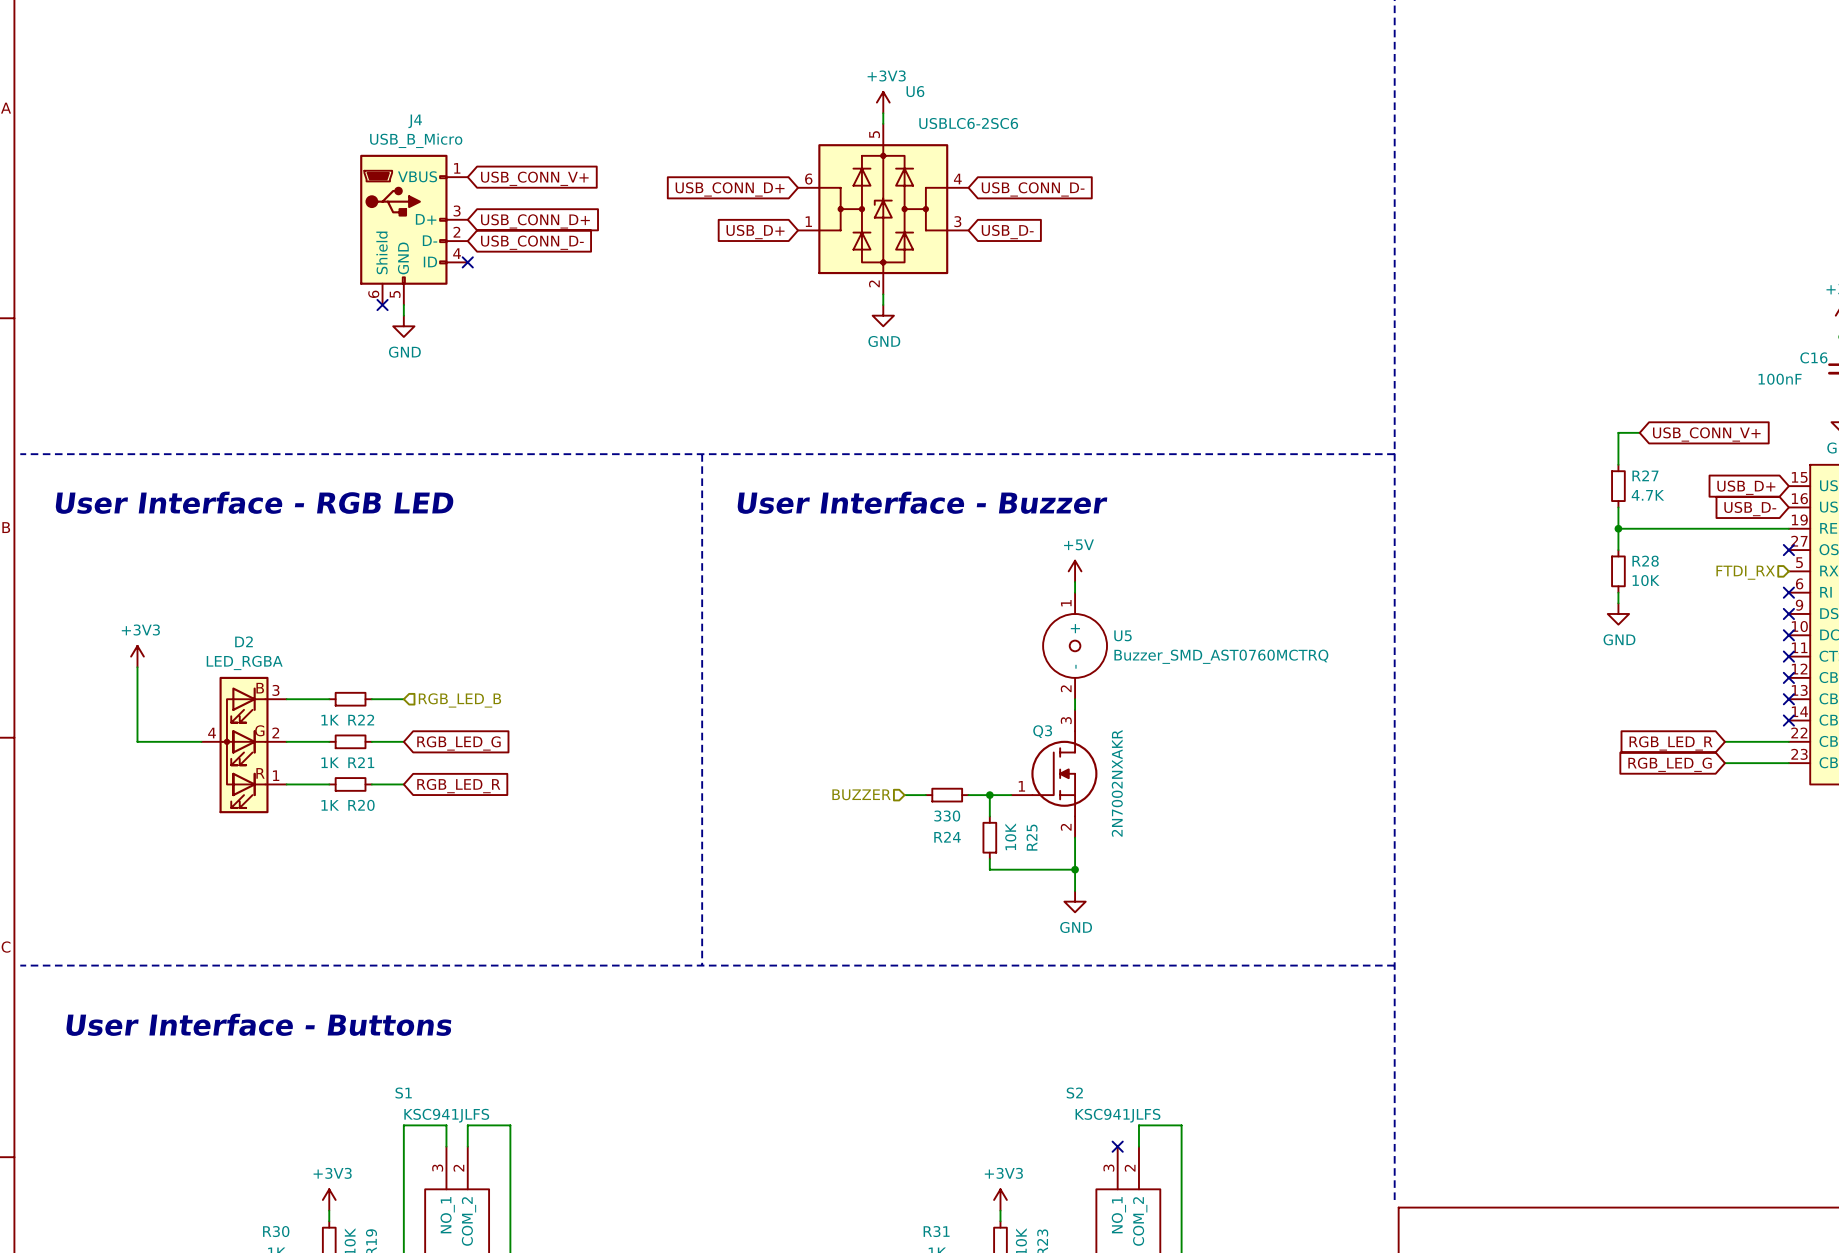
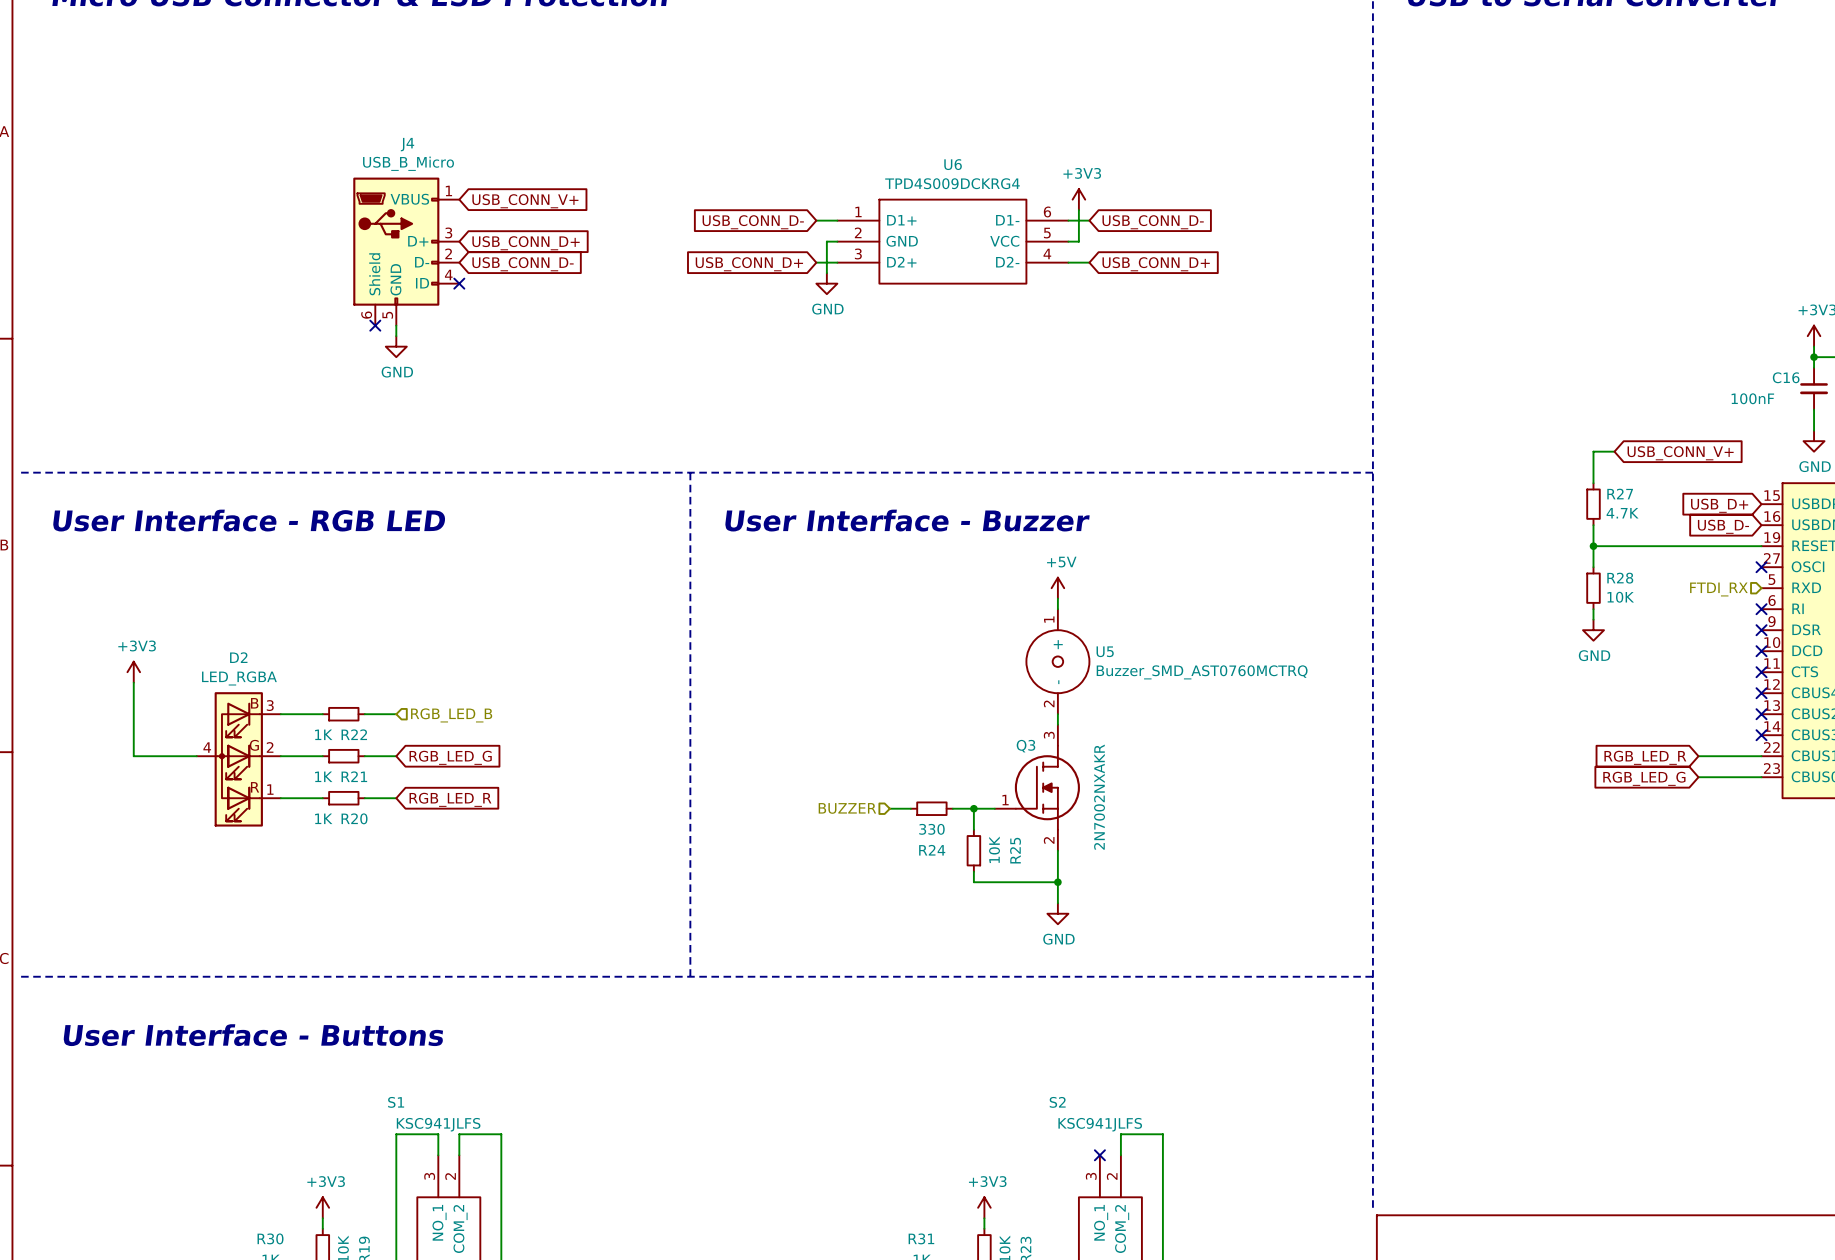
U6 name position: U6 (915, 91) -> U6 (953, 164)
power symbol: +3V3 (883, 102) -> none
wire: (883, 113) (883, 123) -> none
U6 symbol: [798, 123, 969, 295] -> [837, 198, 1069, 285]
U6 value: USBLC6-2SC6 (968, 123) -> TPD4S009DCKRG4 (952, 183)
power symbol: none -> +3V3 (1078, 199)
wire: none -> (1078, 210) (1078, 241) (1068, 241)
global label position: USB_CONN_D+ (730, 189) -> USB_CONN_D+ (749, 264)
global label position: USB_CONN_D- (1033, 189) -> USB_CONN_D- (1153, 222)
wire: none -> (1068, 220) (1089, 220)
global label: none -> USB_CONN_D- (753, 222)
global label: USB_D+ (755, 232) -> none
global label: USB_D- (1007, 232) -> none
wire: none -> (1068, 262) (1089, 262)
global label: none -> USB_CONN_D+ (1156, 264)
wire: (883, 294) (883, 305) -> none
power symbol position: GND (883, 315) -> GND (826, 283)

